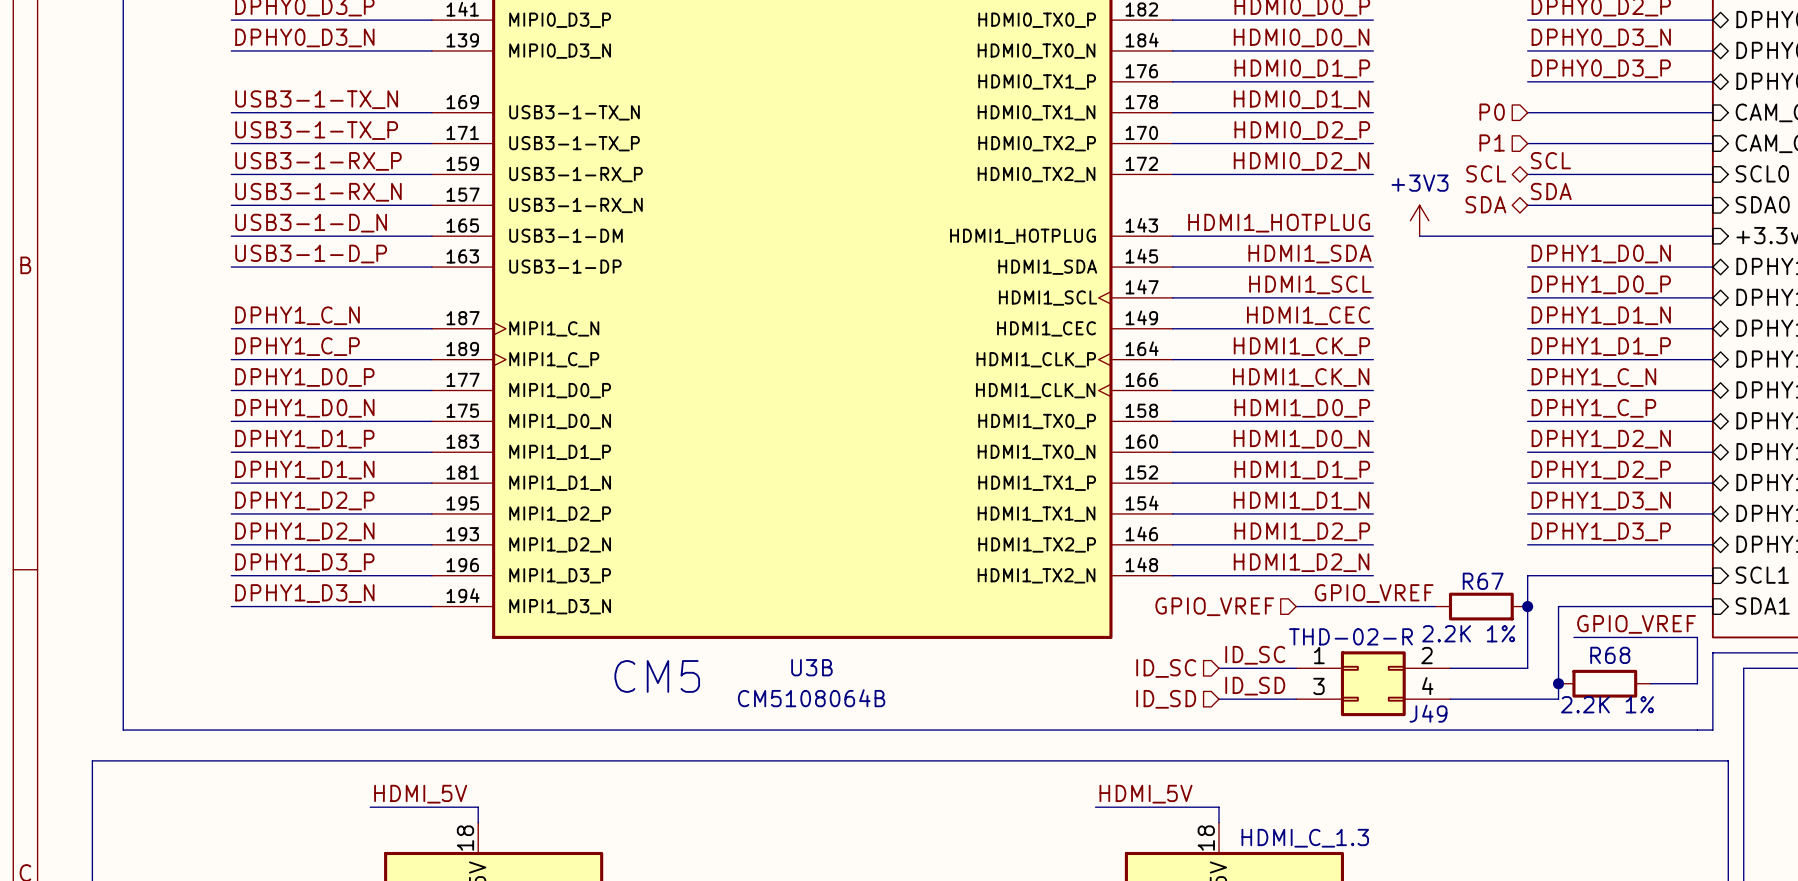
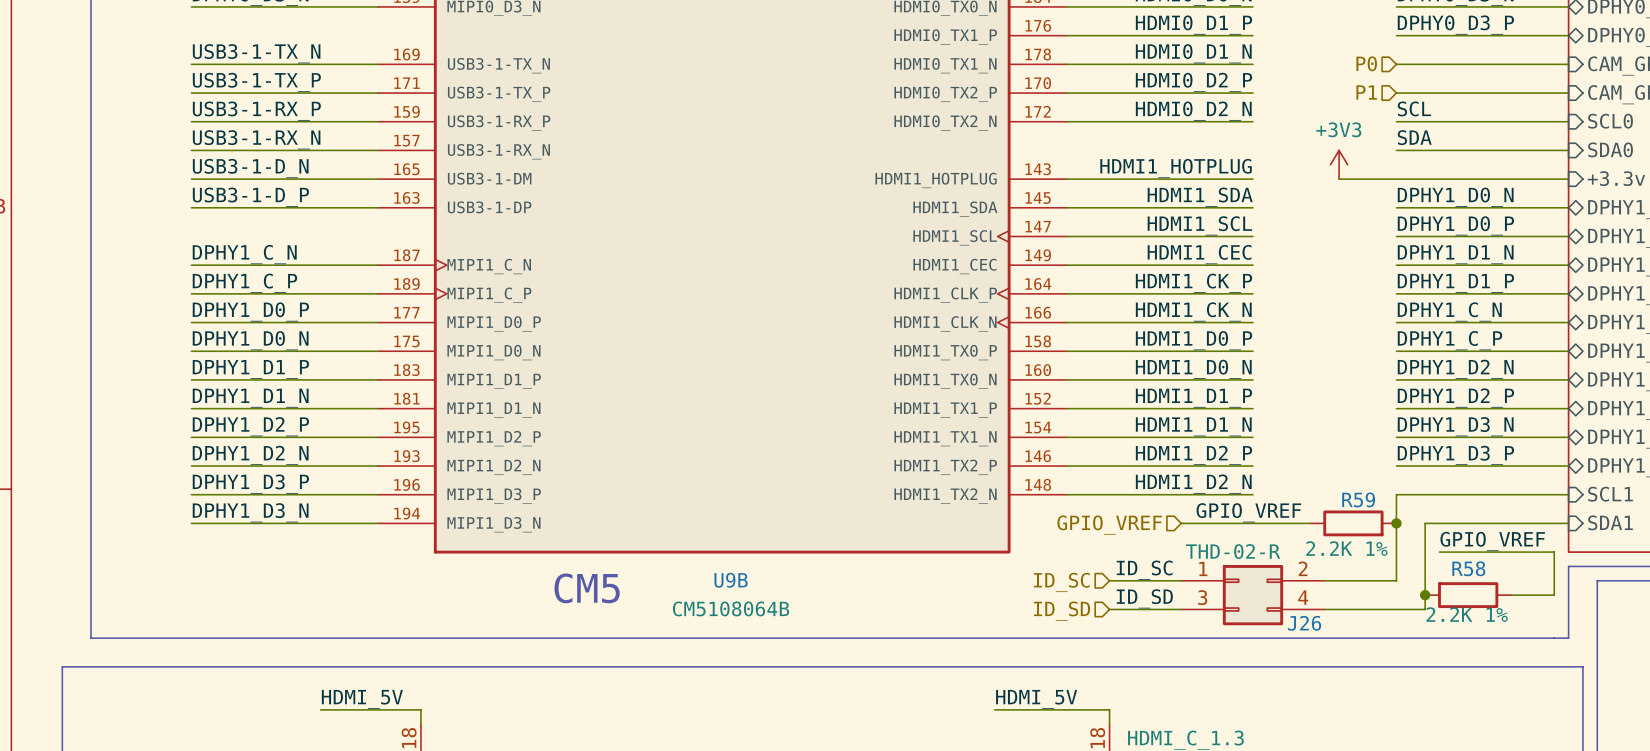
hierarchical label: SCL (1486, 173) -> none
hierarchical label: SDA (1485, 204) -> none
power symbol position: +3V3 (1419, 220) -> +3V3 (1339, 164)
wire: (1419, 236) (1465, 236) -> none
R67 name: R67 (1483, 581) -> R59 (1358, 499)
R68 name: R68 (1610, 655) -> R58 (1468, 568)
U3B name: U3B (811, 667) -> U9B (731, 580)
J49 name: J49 (1428, 713) -> J26 (1304, 623)

